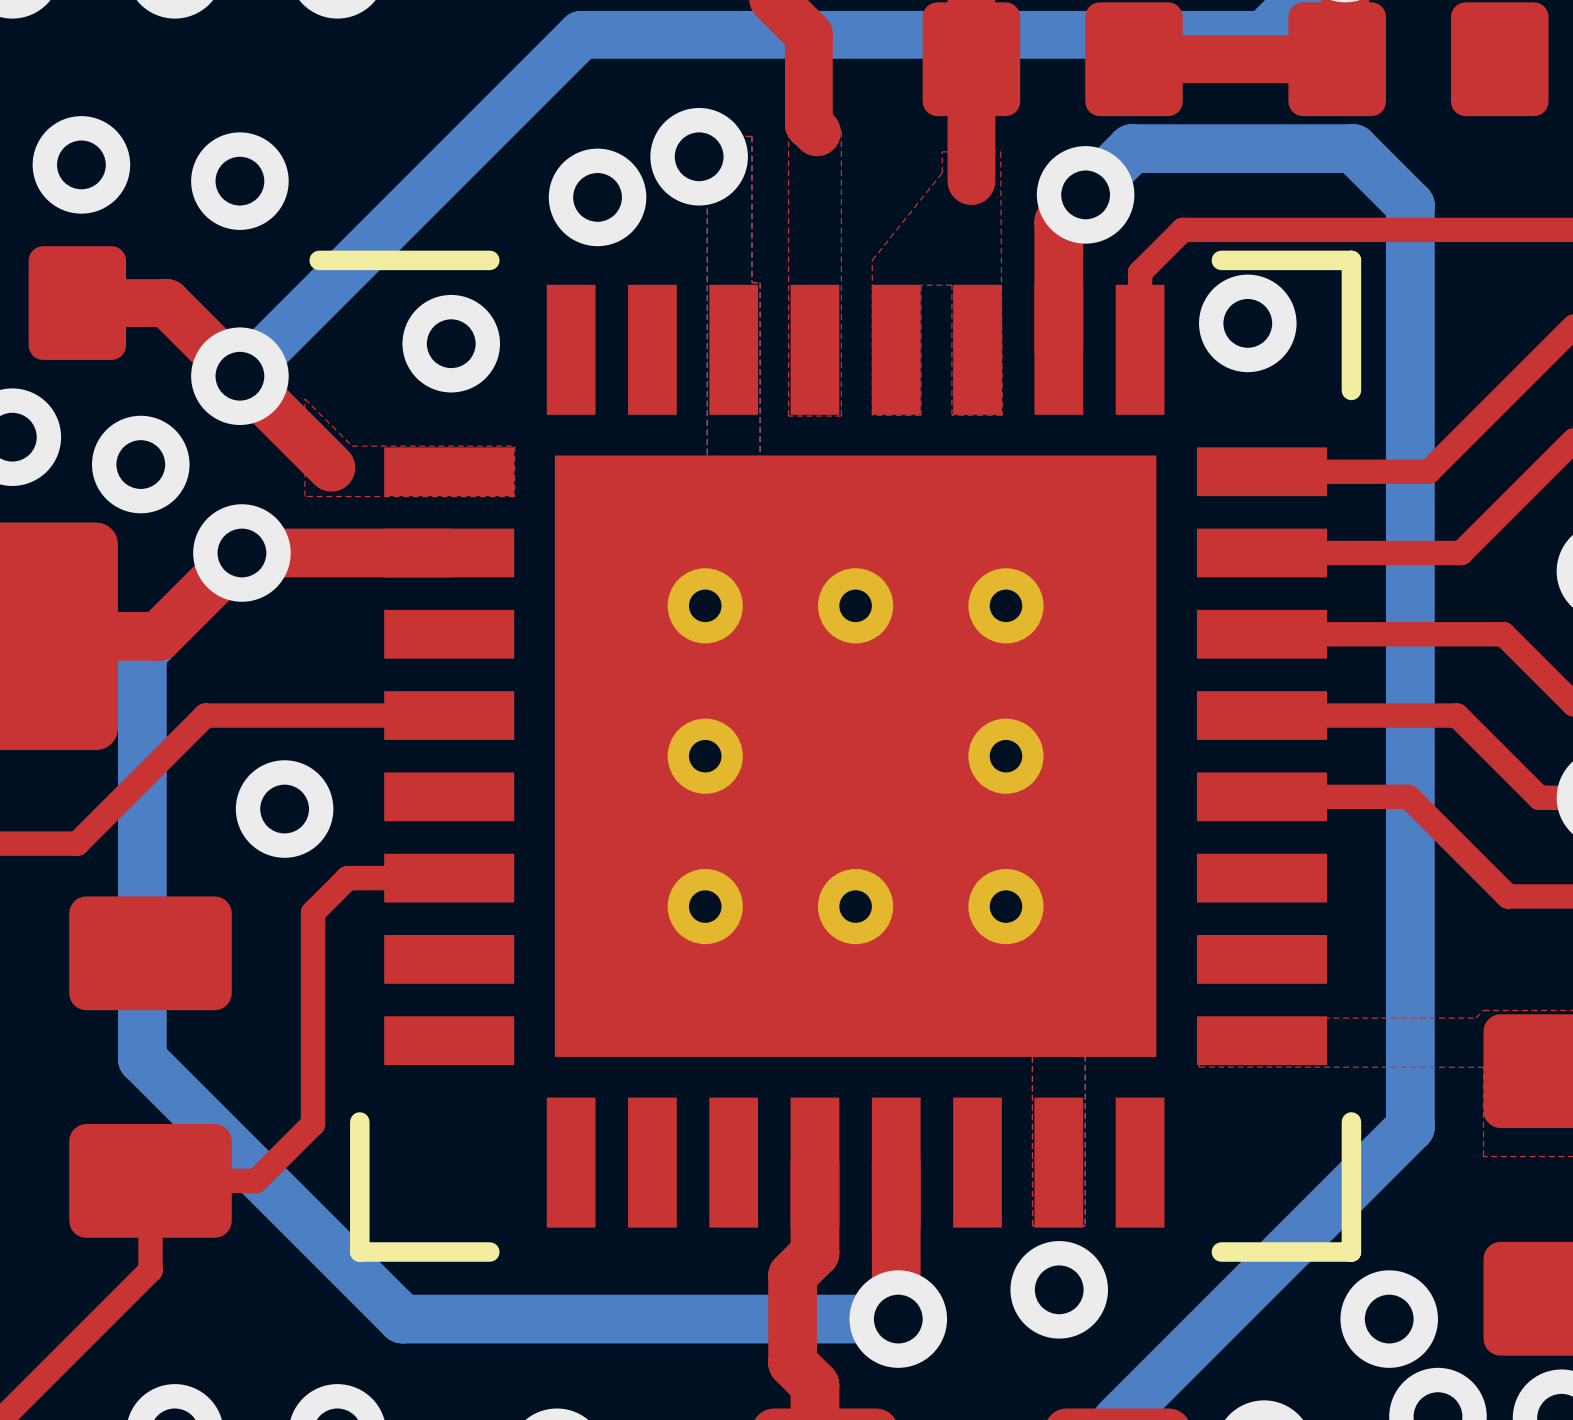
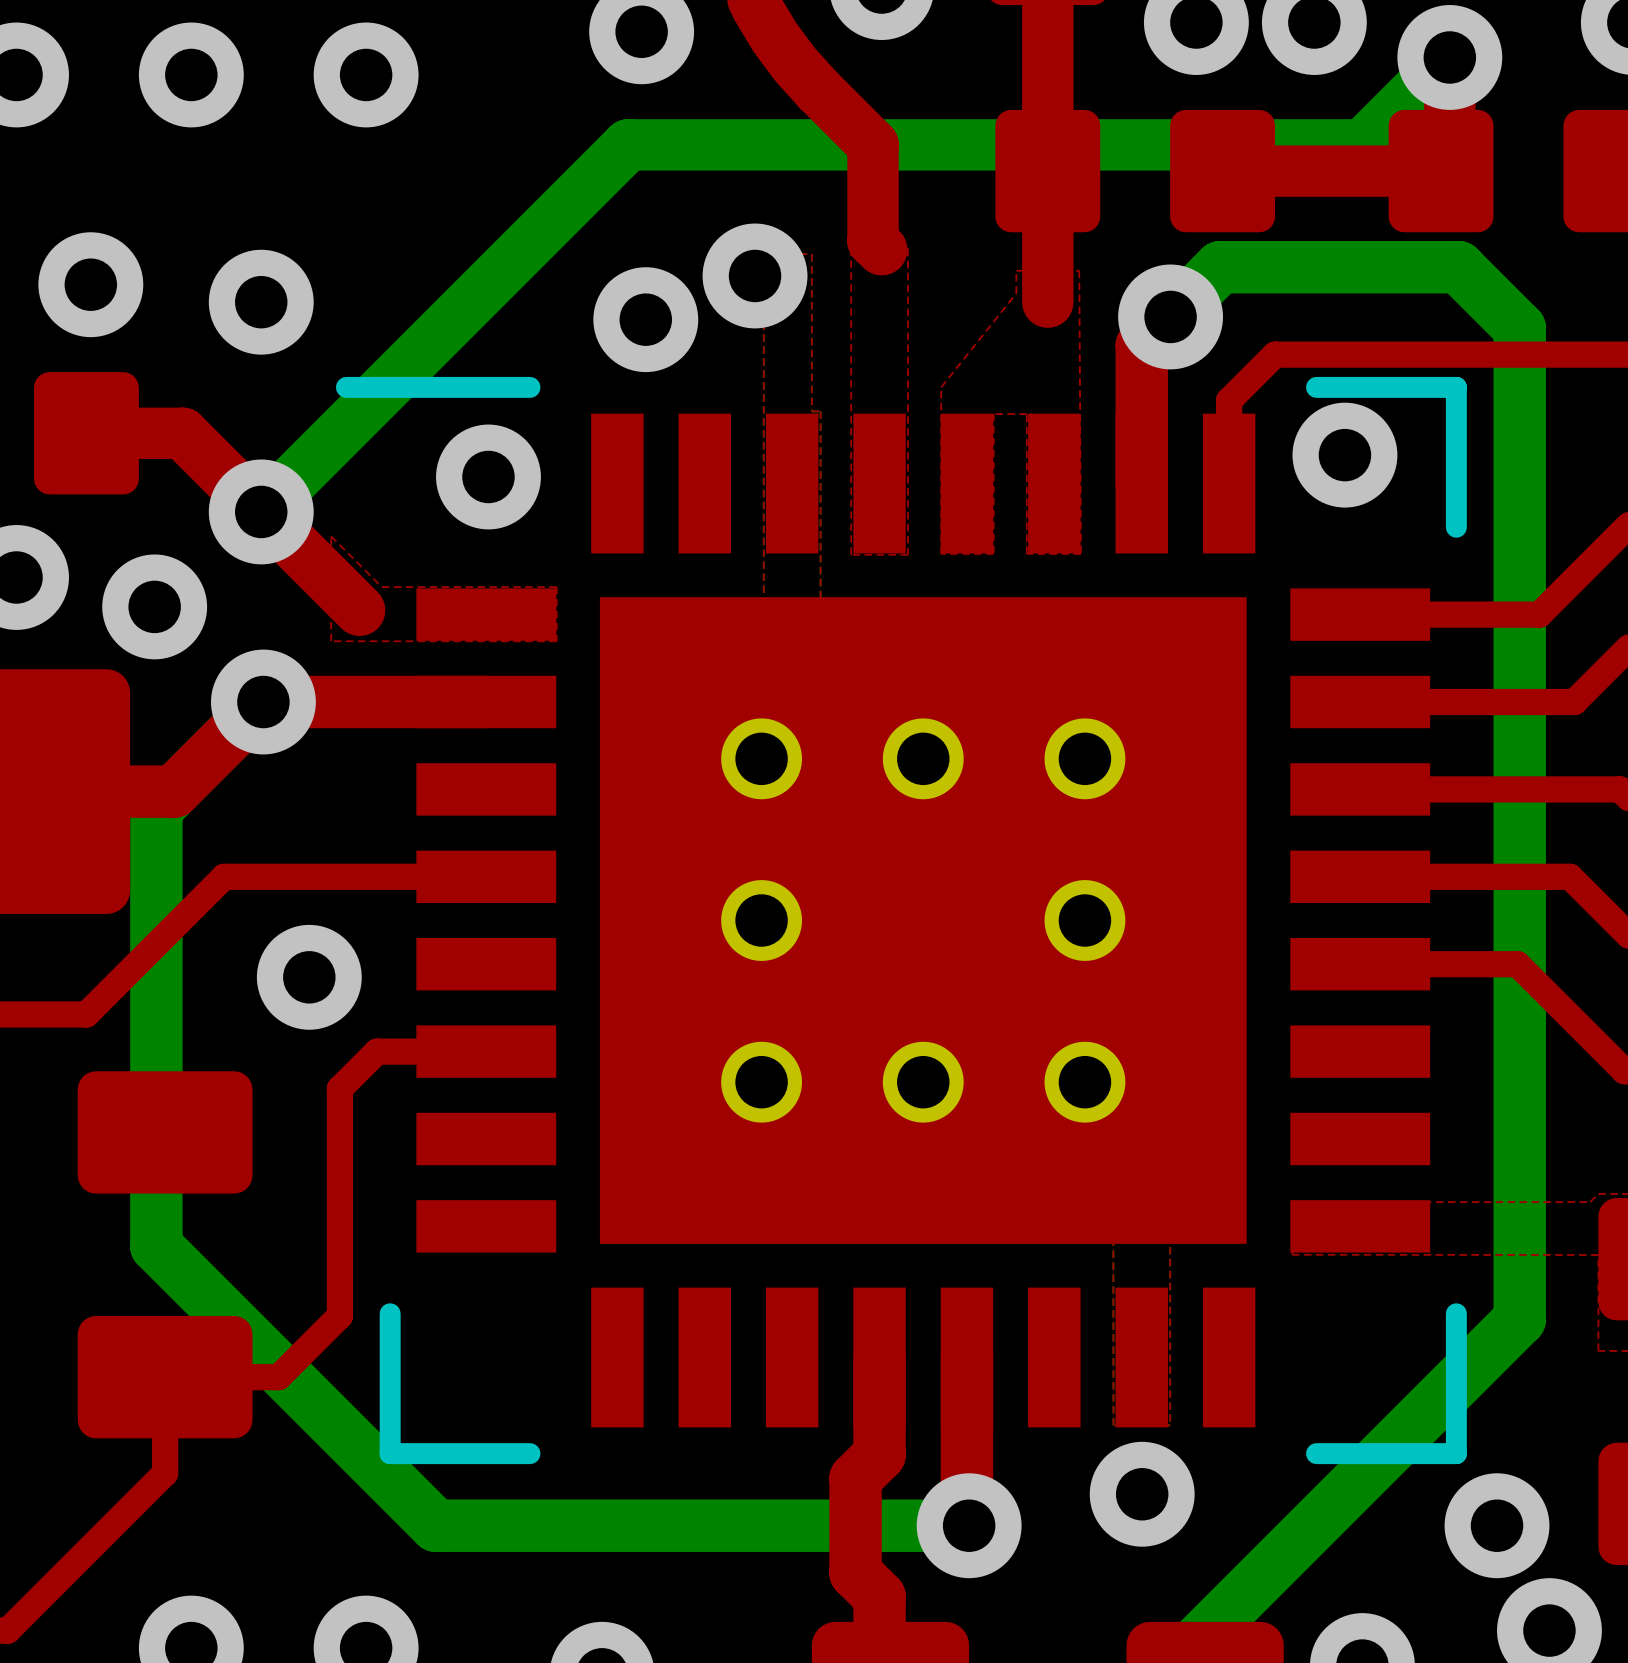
part footprint: [309, 250, 1362, 1262] -> [335, 376, 1467, 1465]

